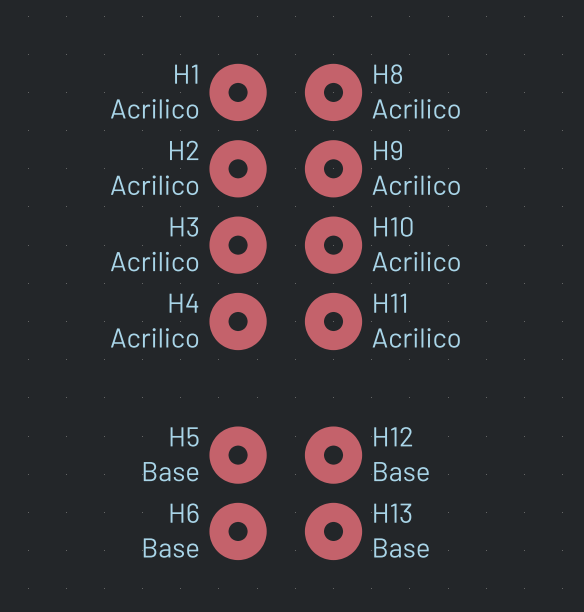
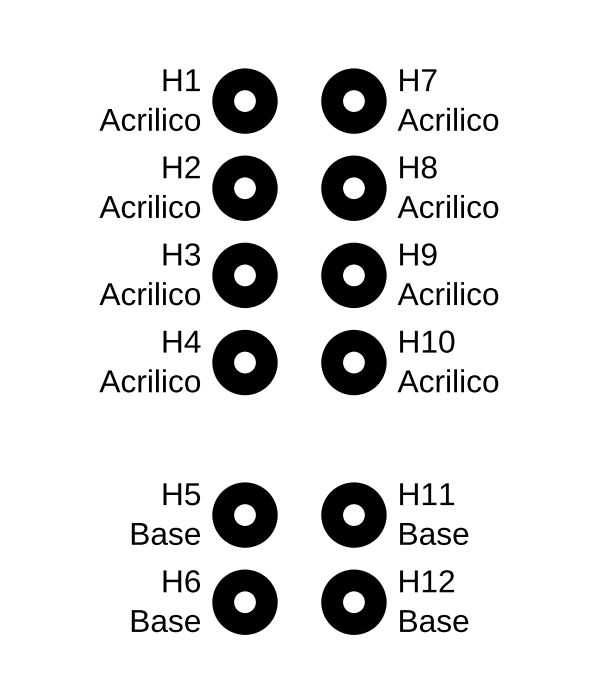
H8 name: H8 (388, 74) -> H7 (418, 80)
H9 name: H9 (388, 150) -> H8 (418, 167)
H10 name: H10 (393, 226) -> H9 (418, 254)
H11 name: H11 (390, 303) -> H10 (427, 341)
H12 name: H12 (393, 436) -> H11 (427, 494)
H13 name: H13 (392, 513) -> H12 (427, 581)

